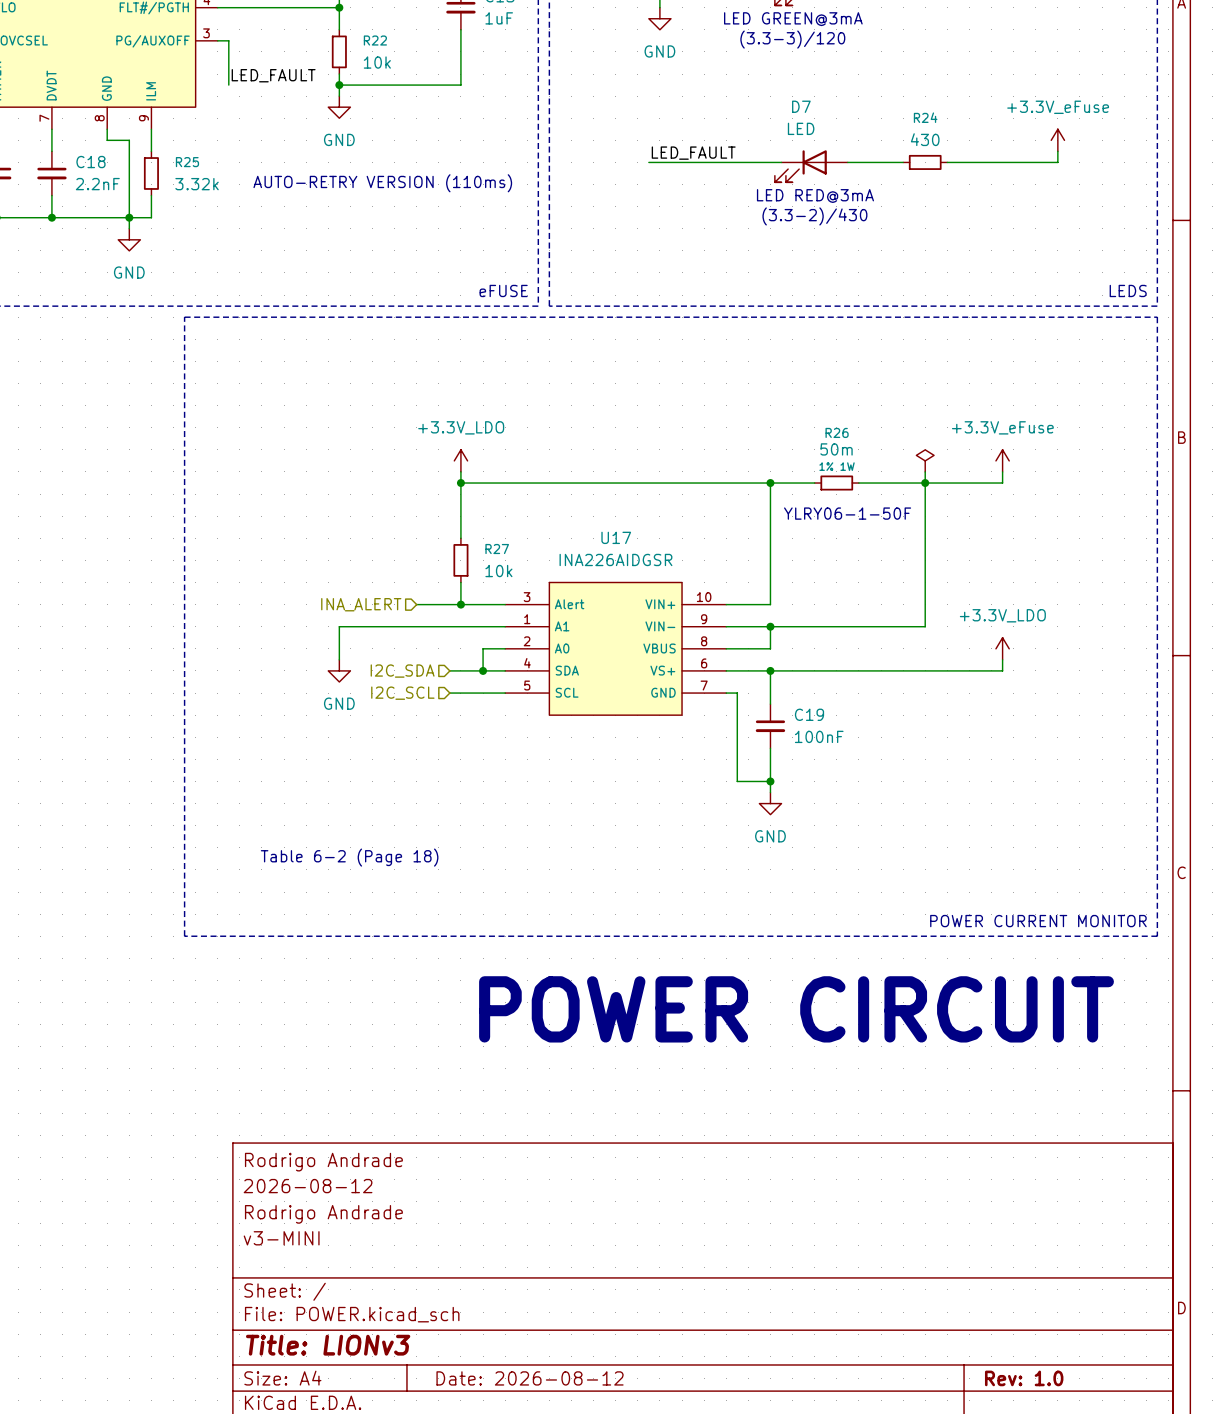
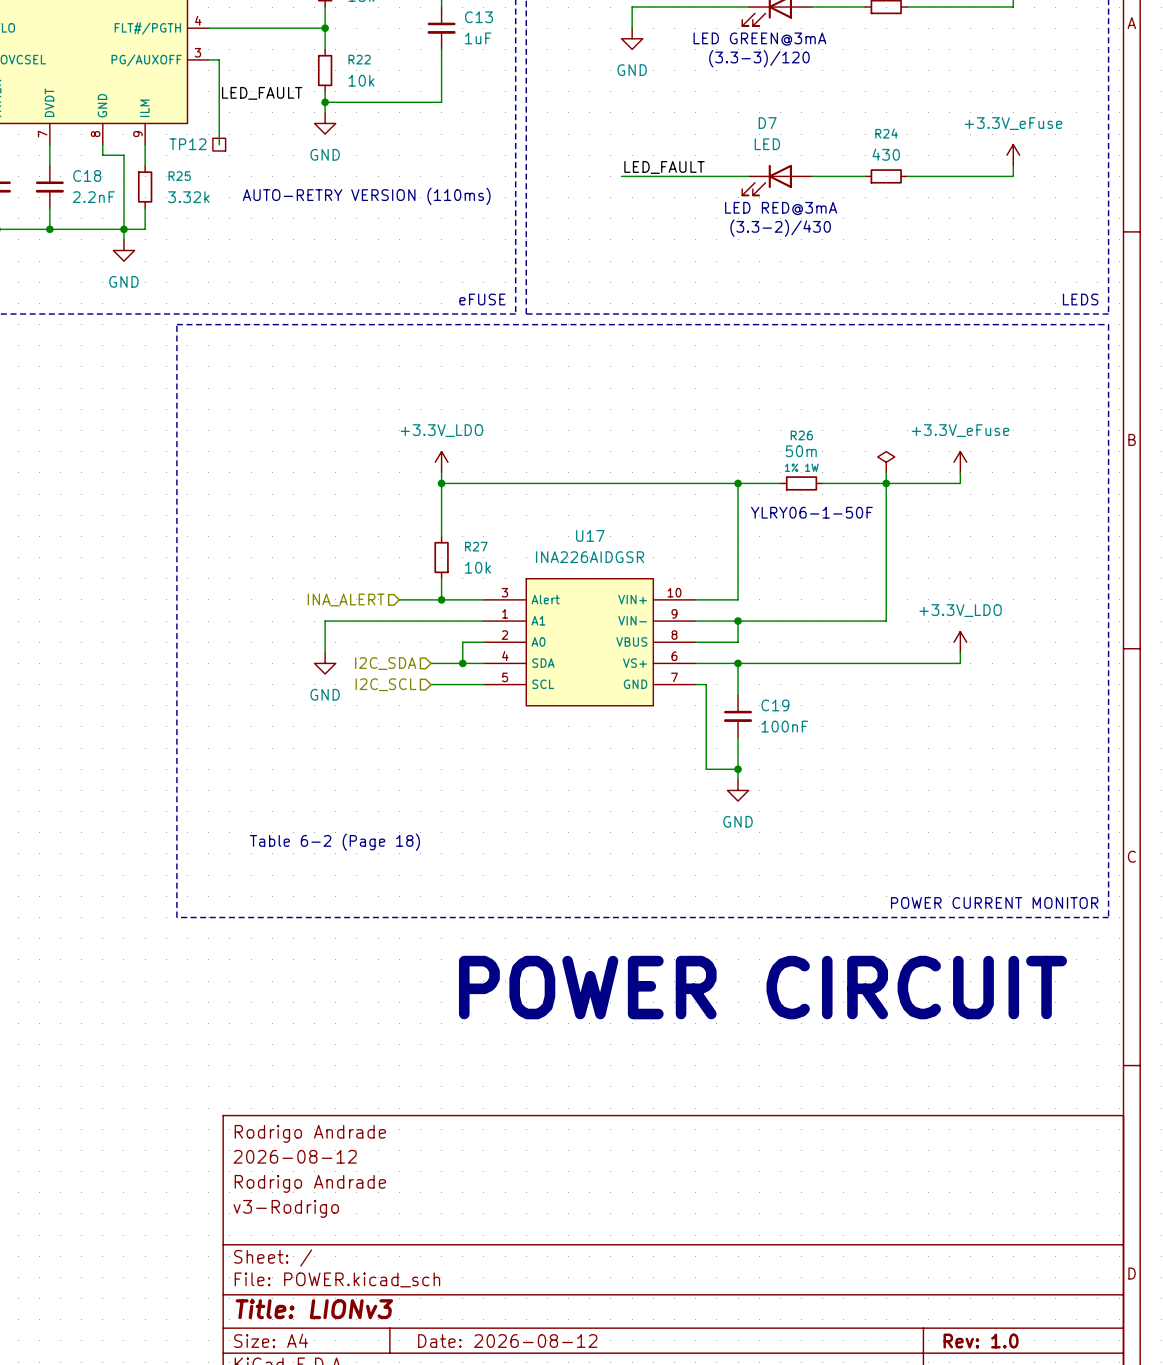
wire: none -> (219, 102) (219, 144)
TP12: none -> (219, 144)
title block: v3-MINI (281, 1238) -> v3-Rodrigo (286, 1208)

